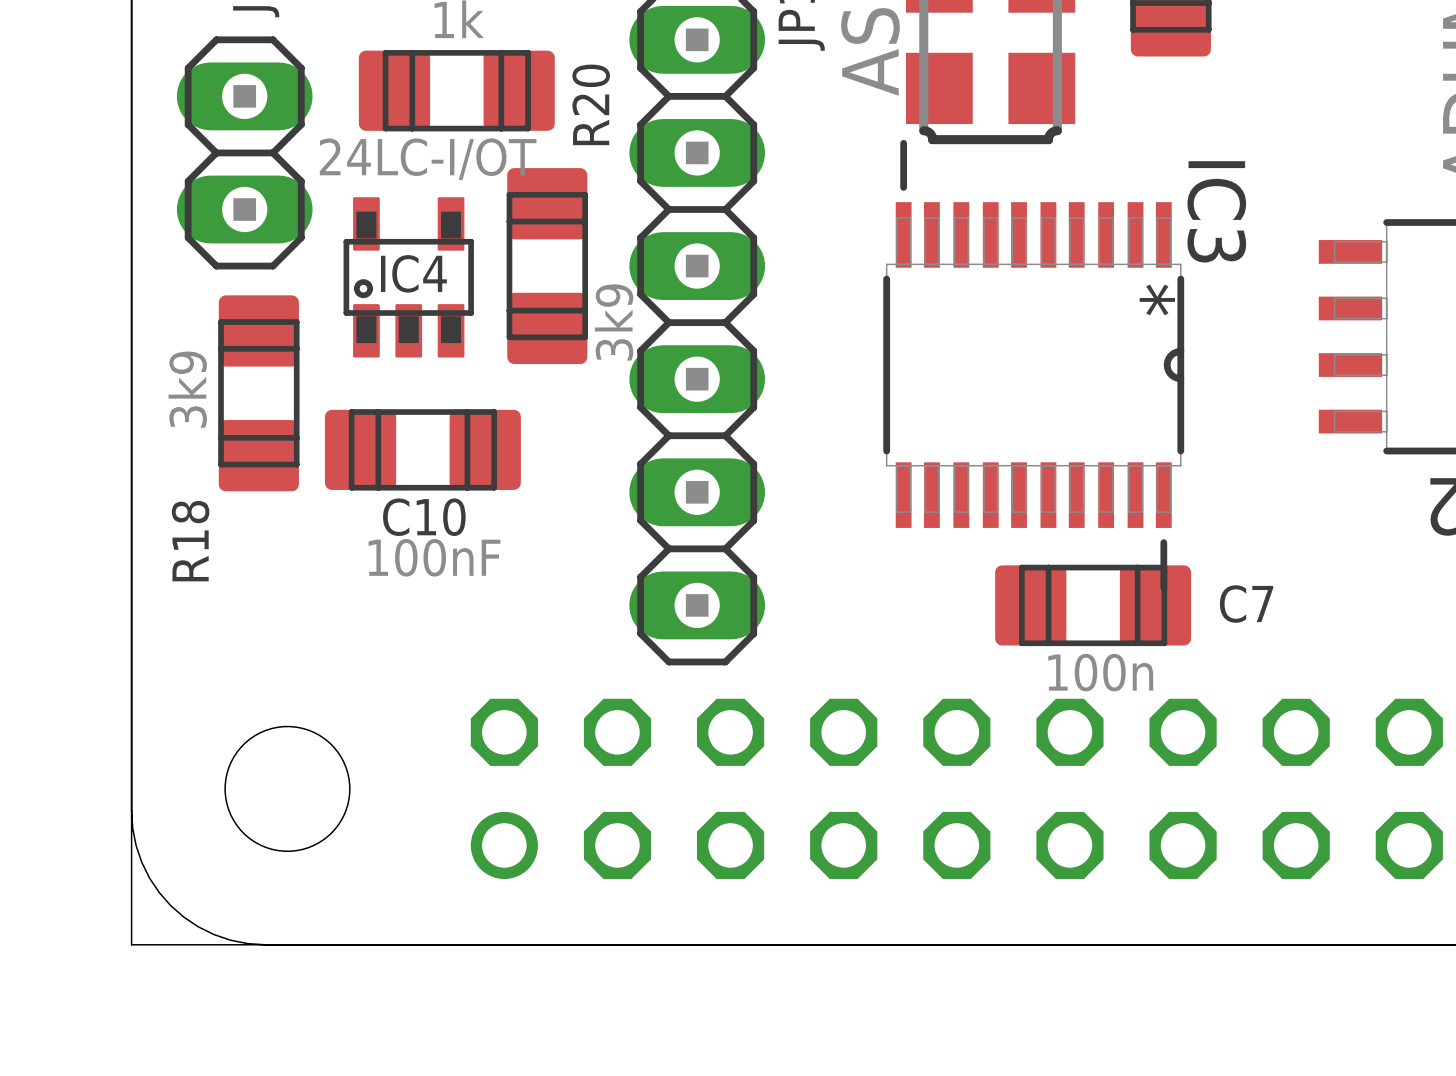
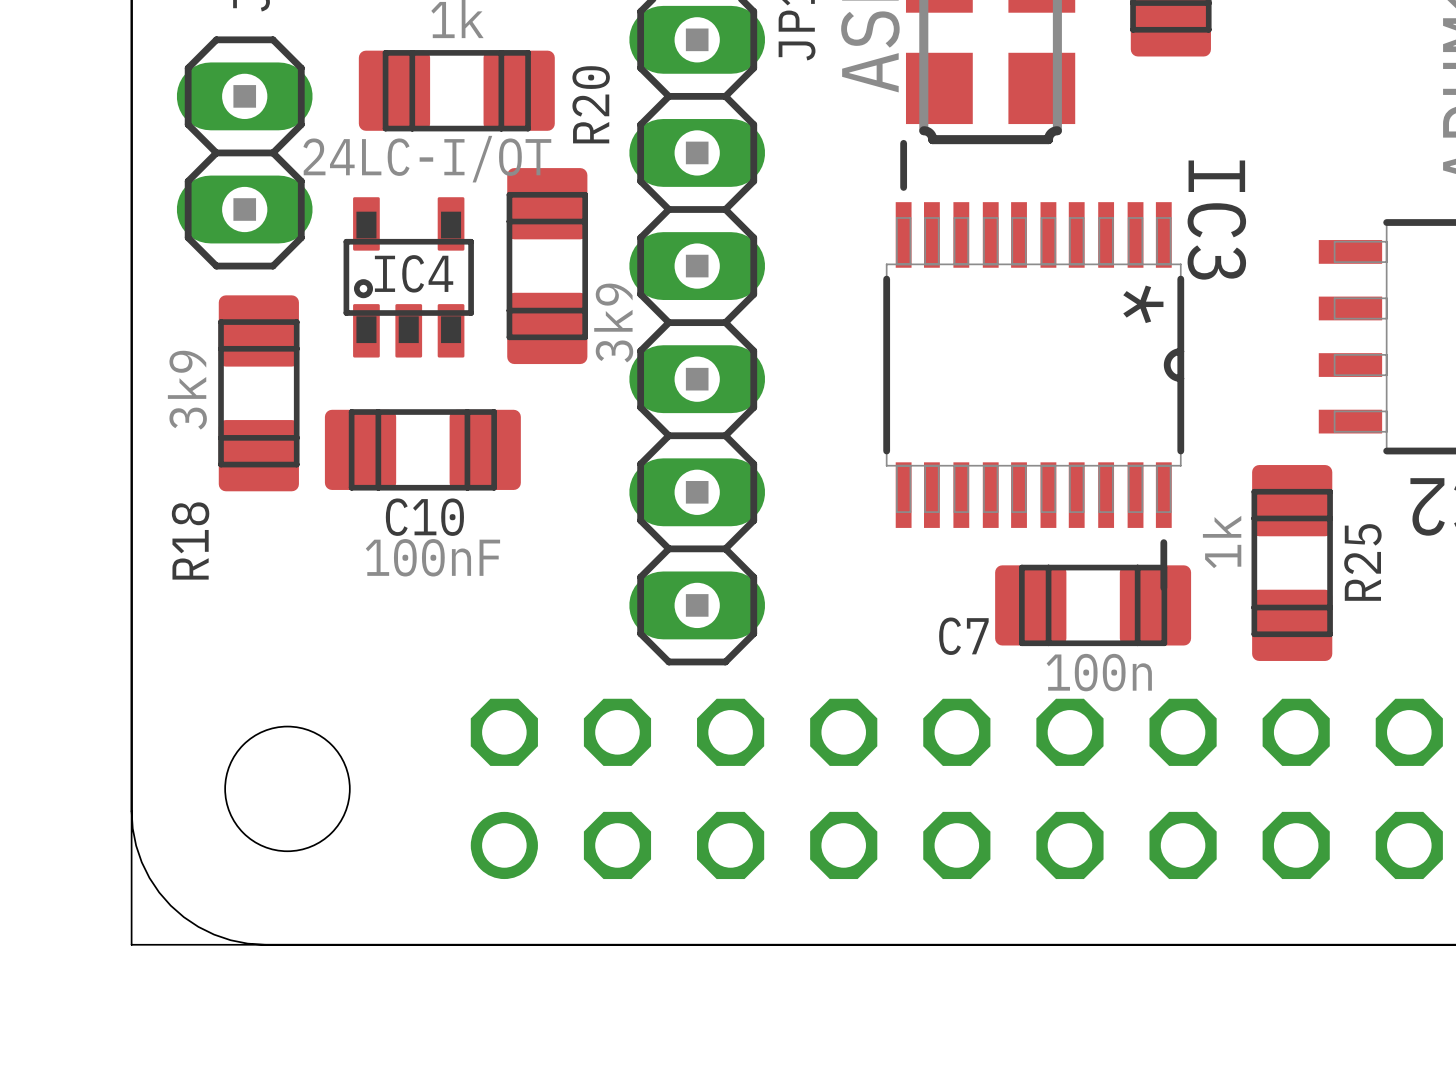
R25: none -> 1k (1292, 563)
C7 name position: C7 (1246, 604) -> C7 (963, 636)

